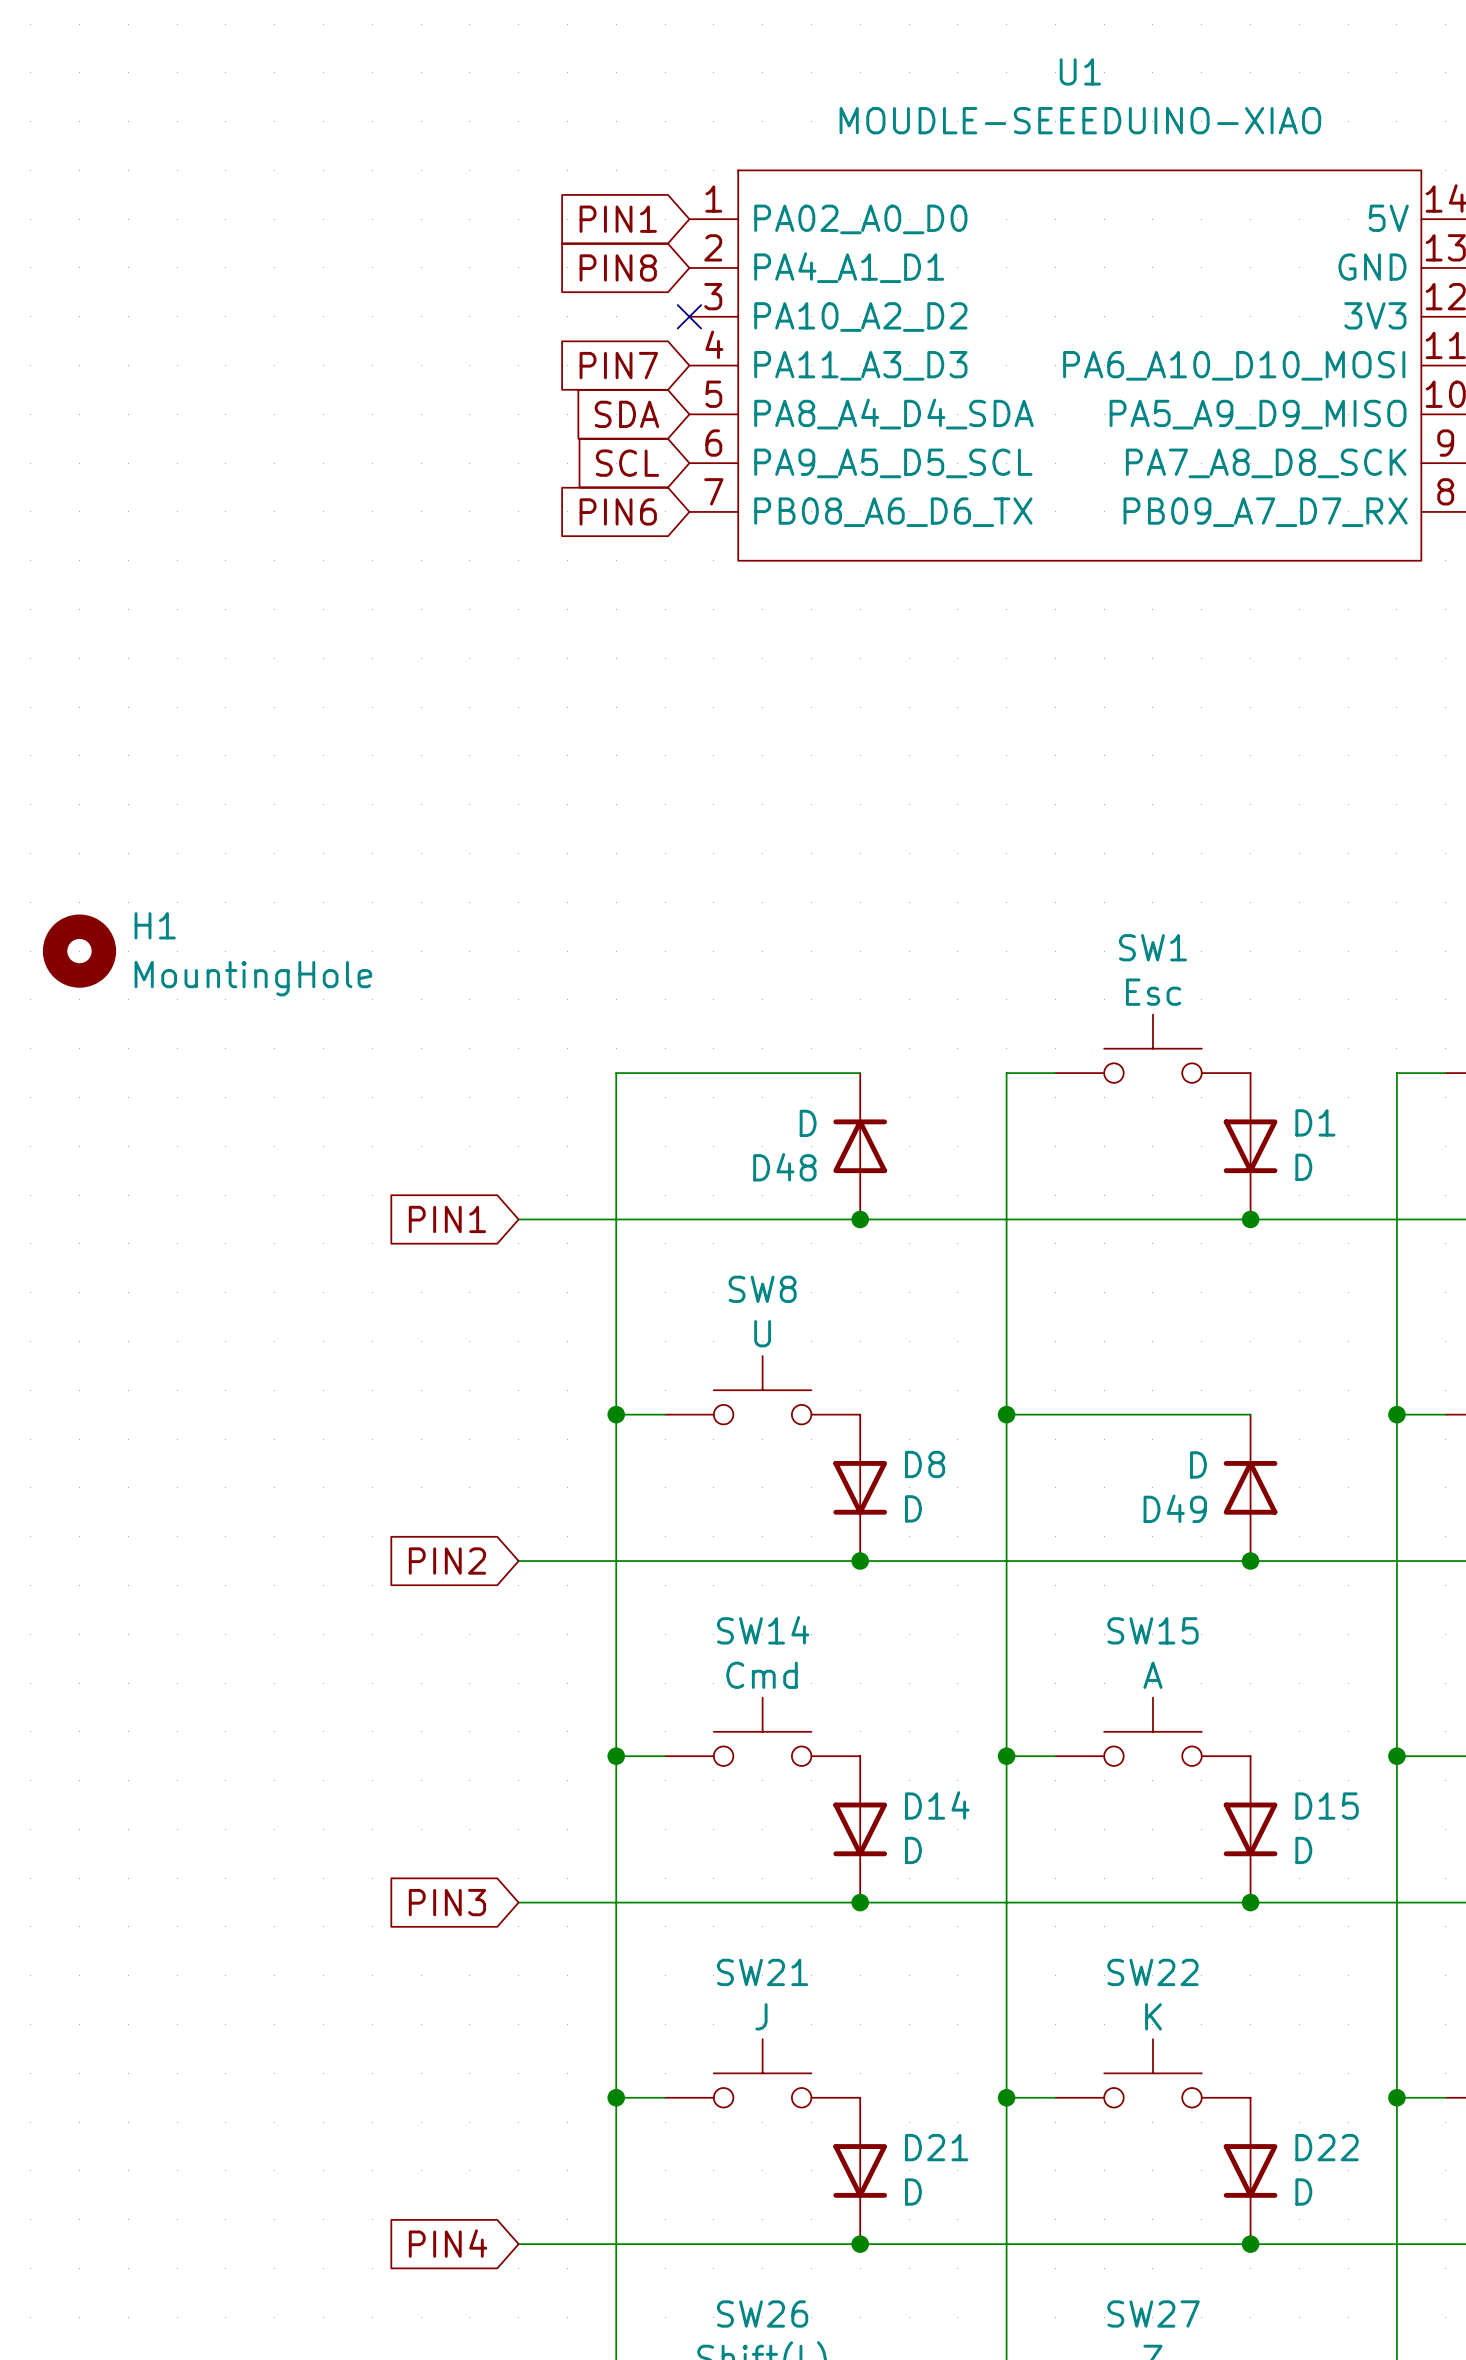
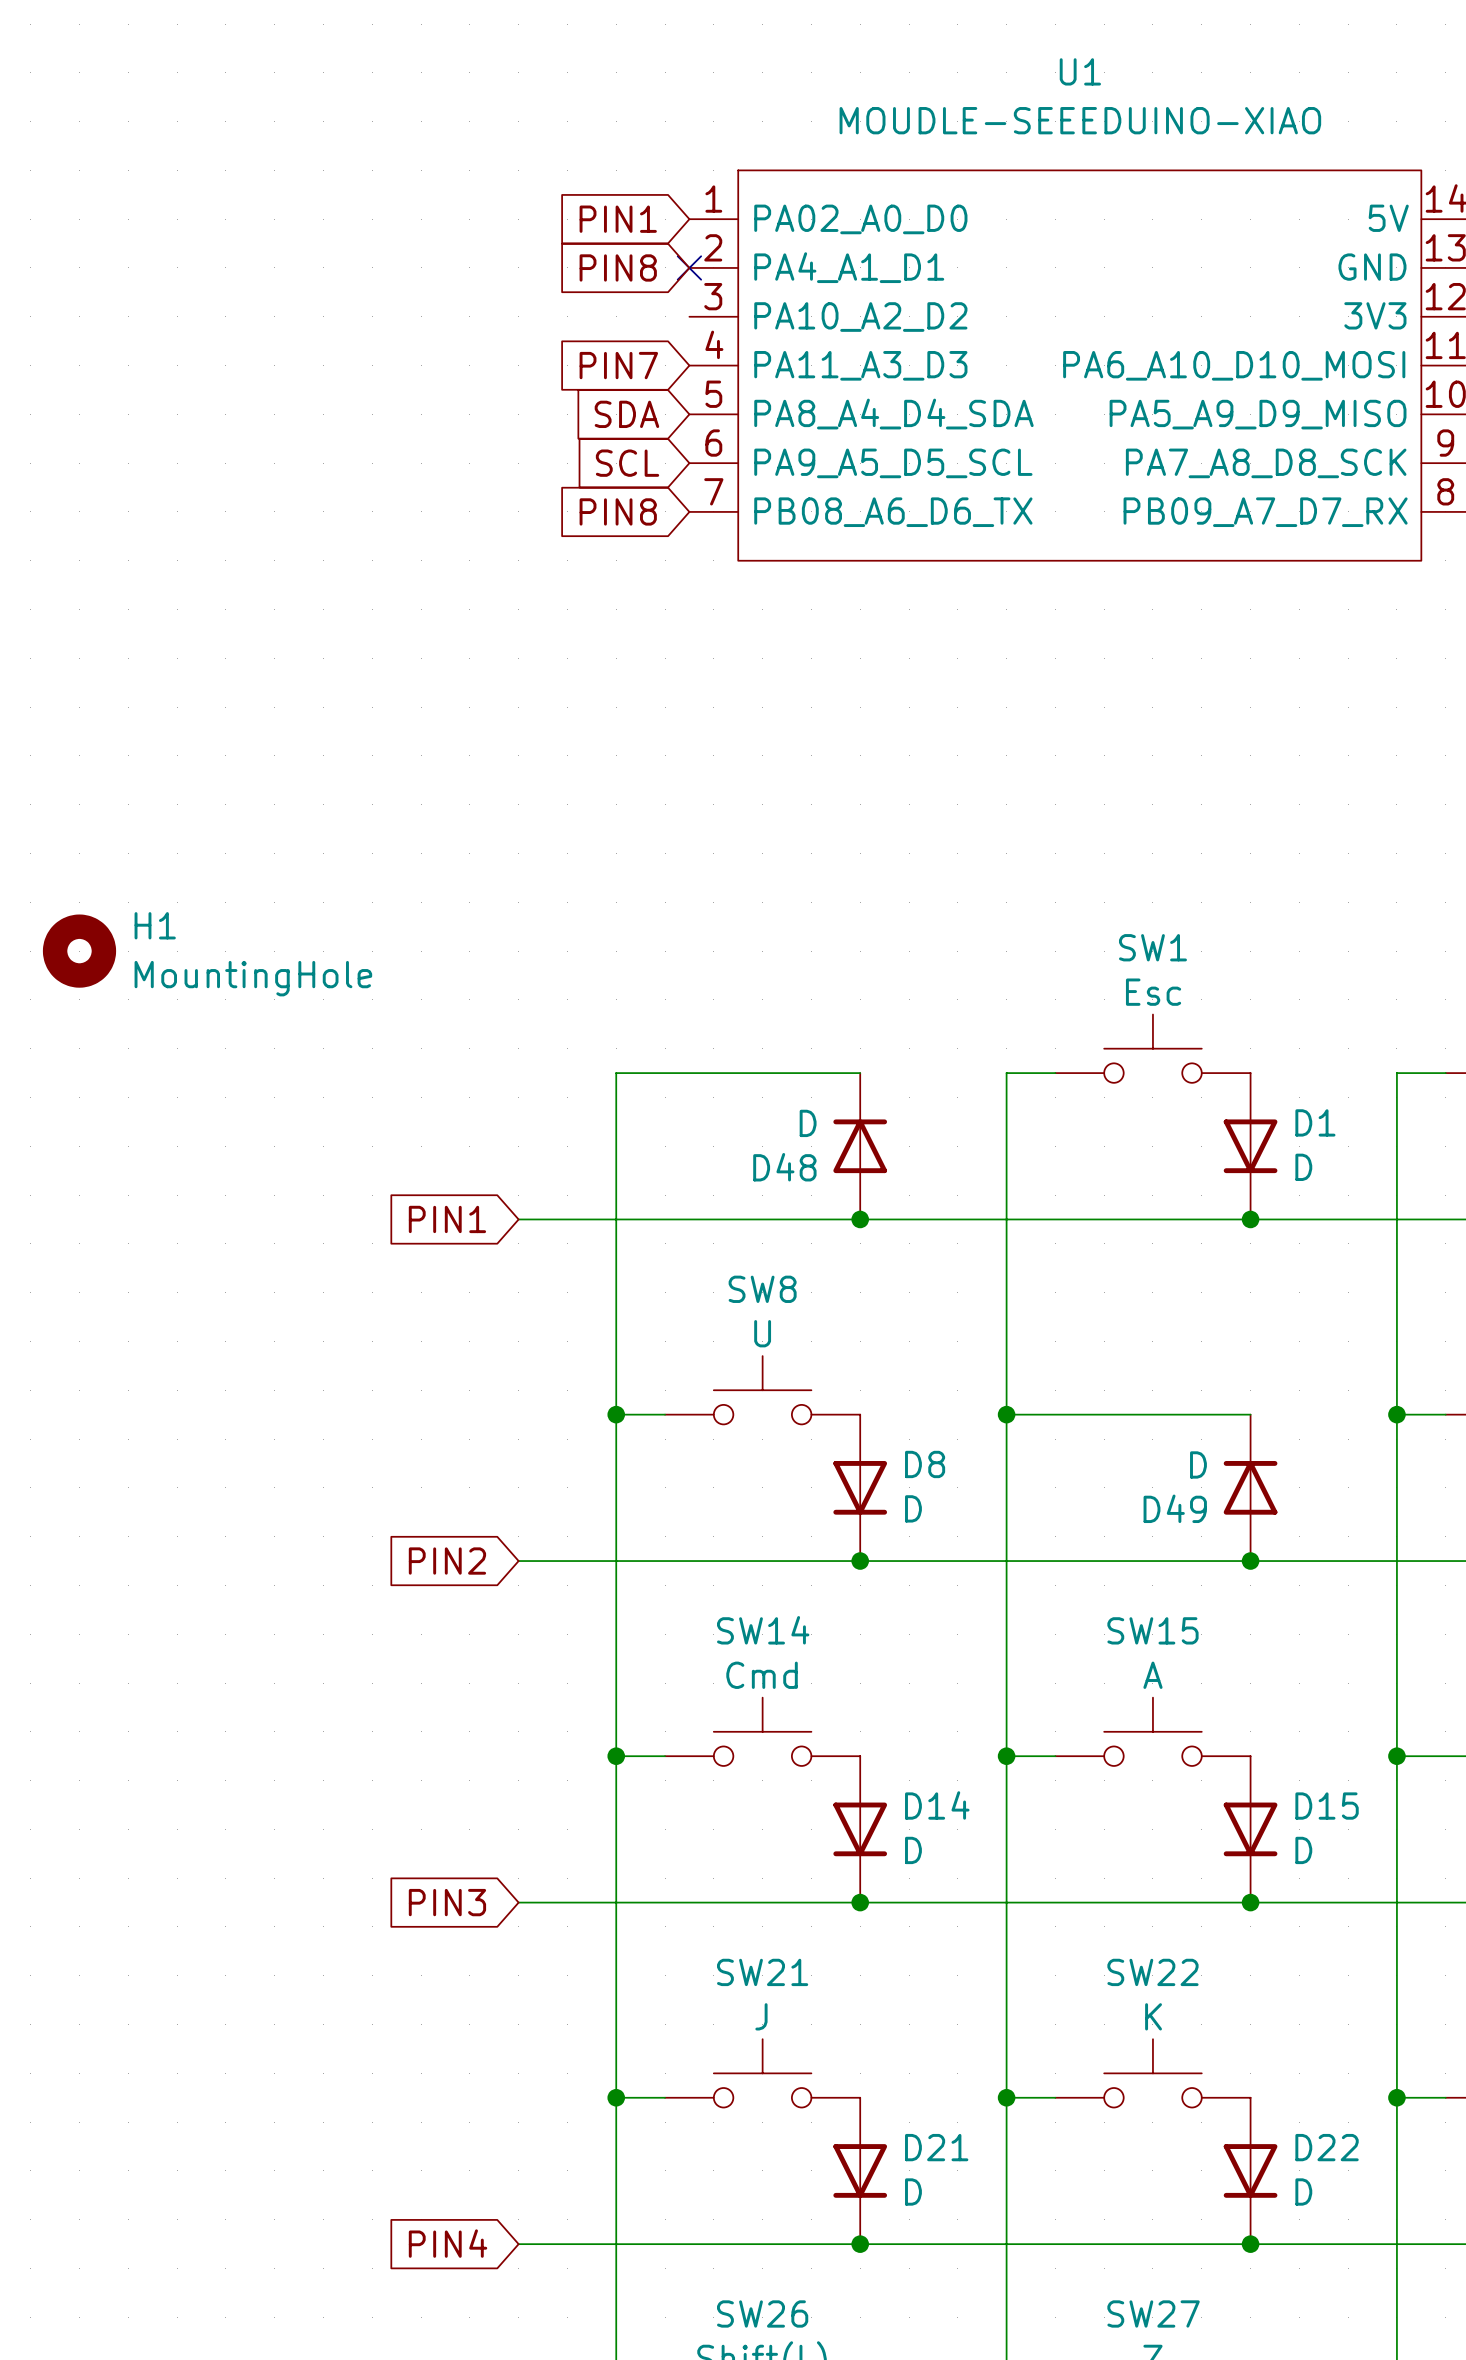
no-connect mark position: (689, 316) -> (689, 267)
global label: PIN6 (618, 511) -> PIN8 (618, 511)

